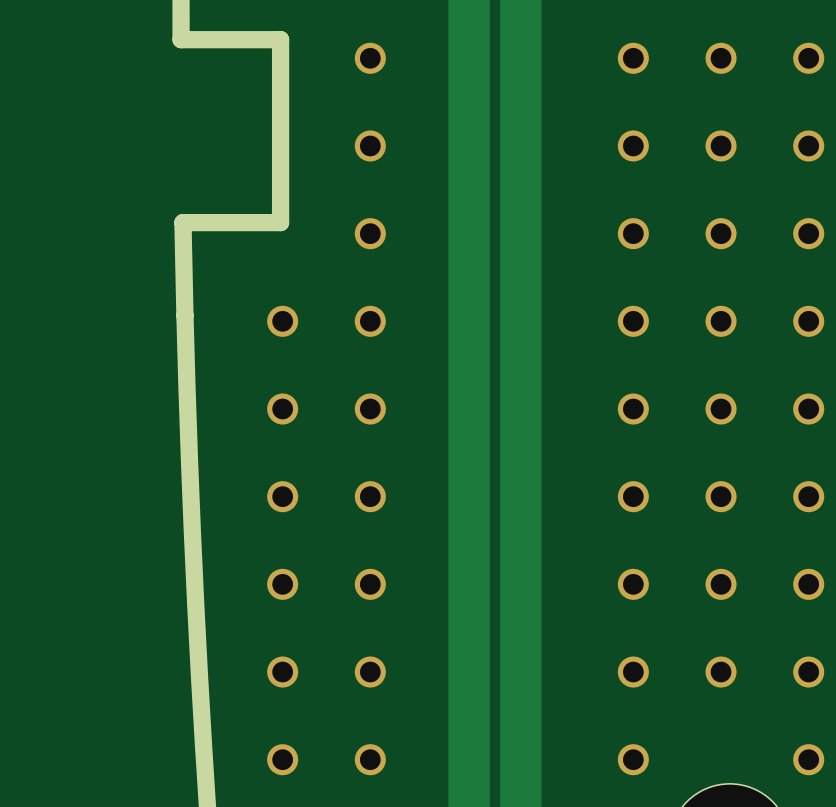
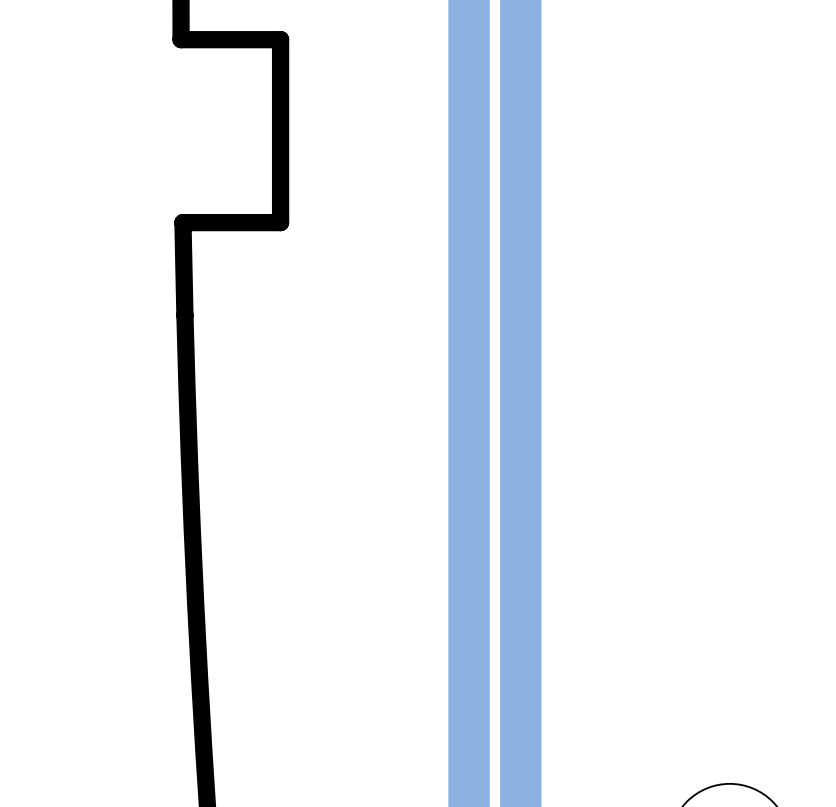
via: (370, 58) -> none
via: (633, 58) -> none
via: (721, 58) -> none
via: (808, 58) -> none
via: (370, 145) -> none
via: (633, 145) -> none
via: (721, 145) -> none
via: (808, 145) -> none
via: (370, 233) -> none
via: (633, 233) -> none
via: (721, 233) -> none
via: (808, 233) -> none
via: (282, 321) -> none
via: (370, 321) -> none
via: (633, 321) -> none
via: (721, 321) -> none
via: (808, 321) -> none
via: (282, 409) -> none
via: (370, 409) -> none
via: (633, 409) -> none
via: (721, 409) -> none
via: (808, 409) -> none
via: (282, 496) -> none
via: (370, 496) -> none
via: (633, 496) -> none
via: (721, 496) -> none
via: (808, 496) -> none
via: (282, 584) -> none
via: (370, 584) -> none
via: (633, 584) -> none
via: (721, 584) -> none
via: (808, 584) -> none
via: (282, 672) -> none
via: (370, 672) -> none
via: (633, 672) -> none
via: (721, 672) -> none
via: (808, 672) -> none
via: (282, 759) -> none
via: (370, 759) -> none
via: (633, 759) -> none
via: (808, 759) -> none

